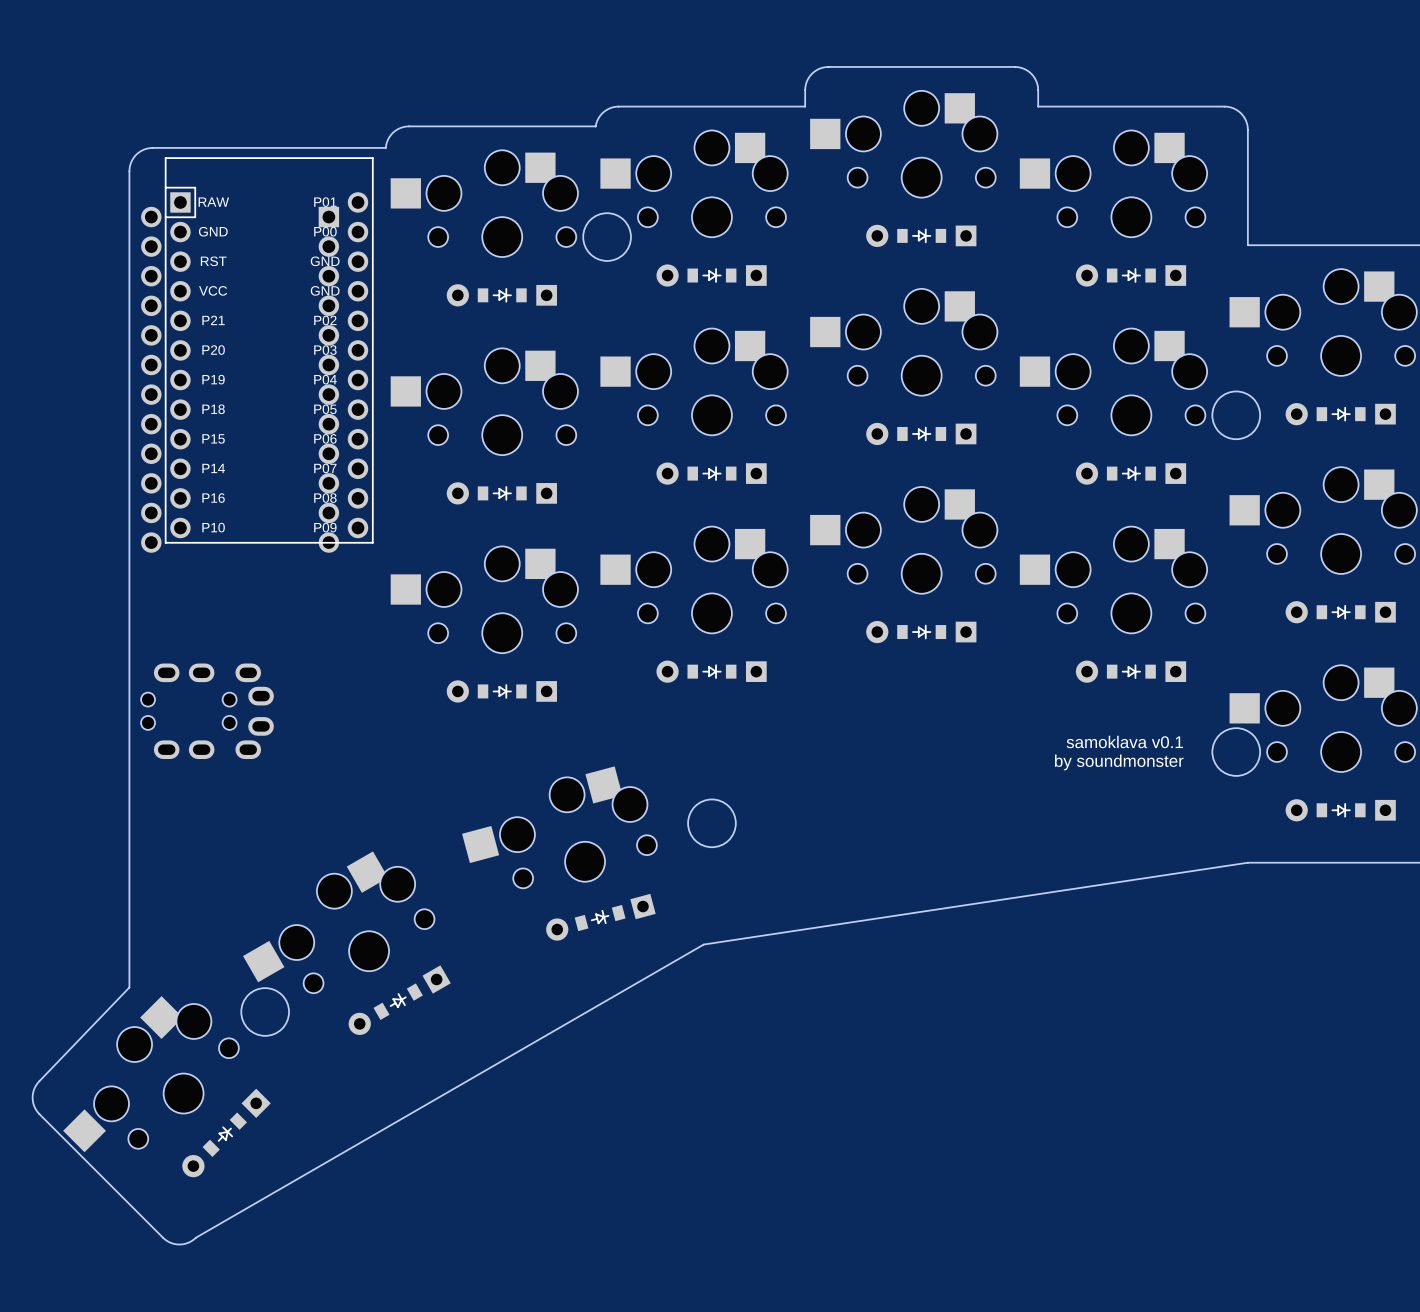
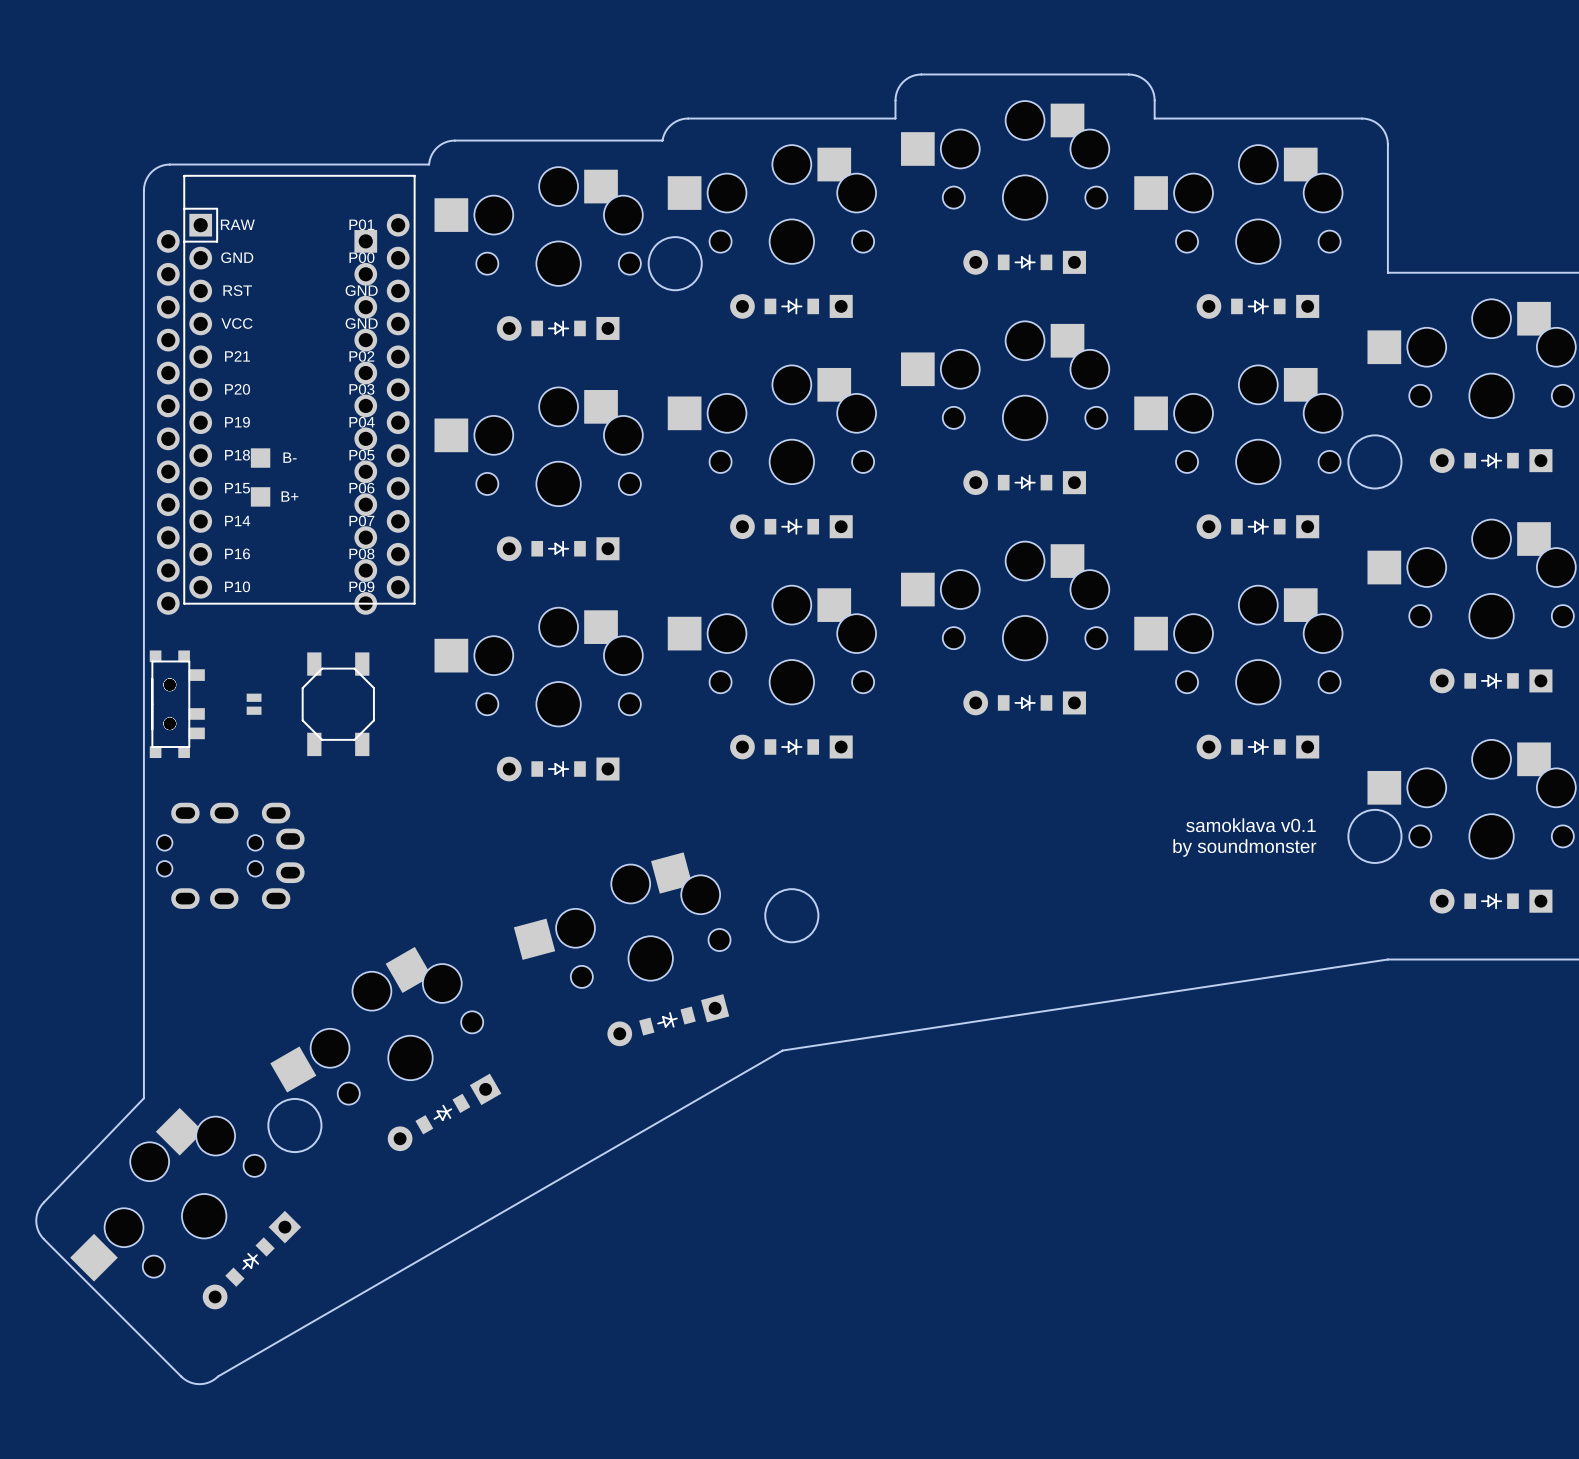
part: none -> (260, 458)
part: none -> (260, 496)
part: none -> (169, 704)
part: none -> (177, 704)
part: none -> (254, 704)
part: none -> (338, 704)
part position: (207, 699) -> (230, 842)
part position: (207, 722) -> (230, 868)

